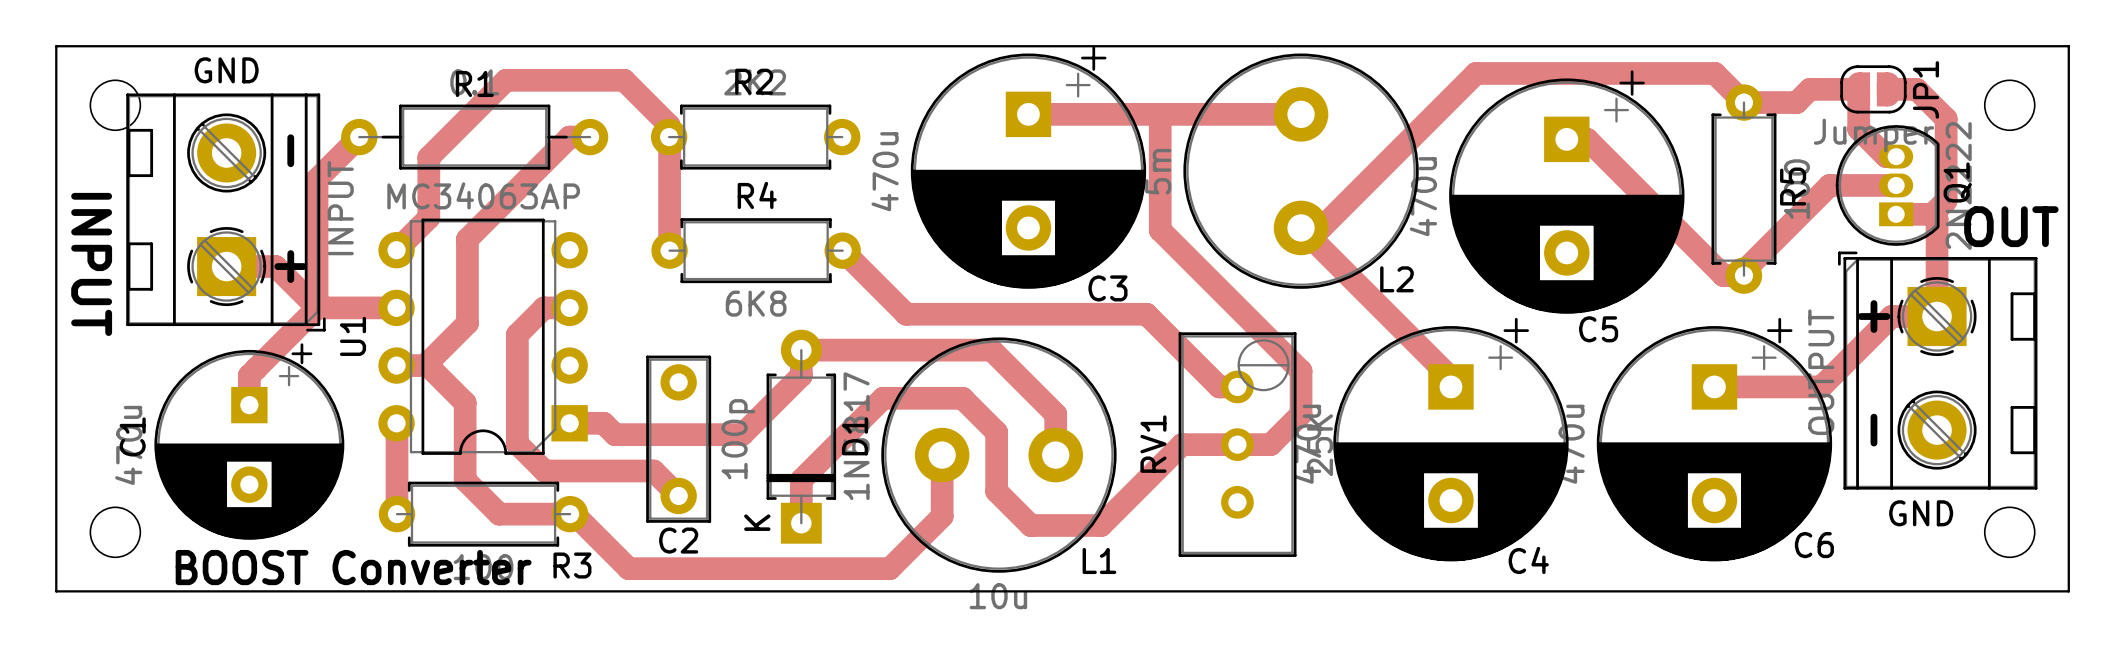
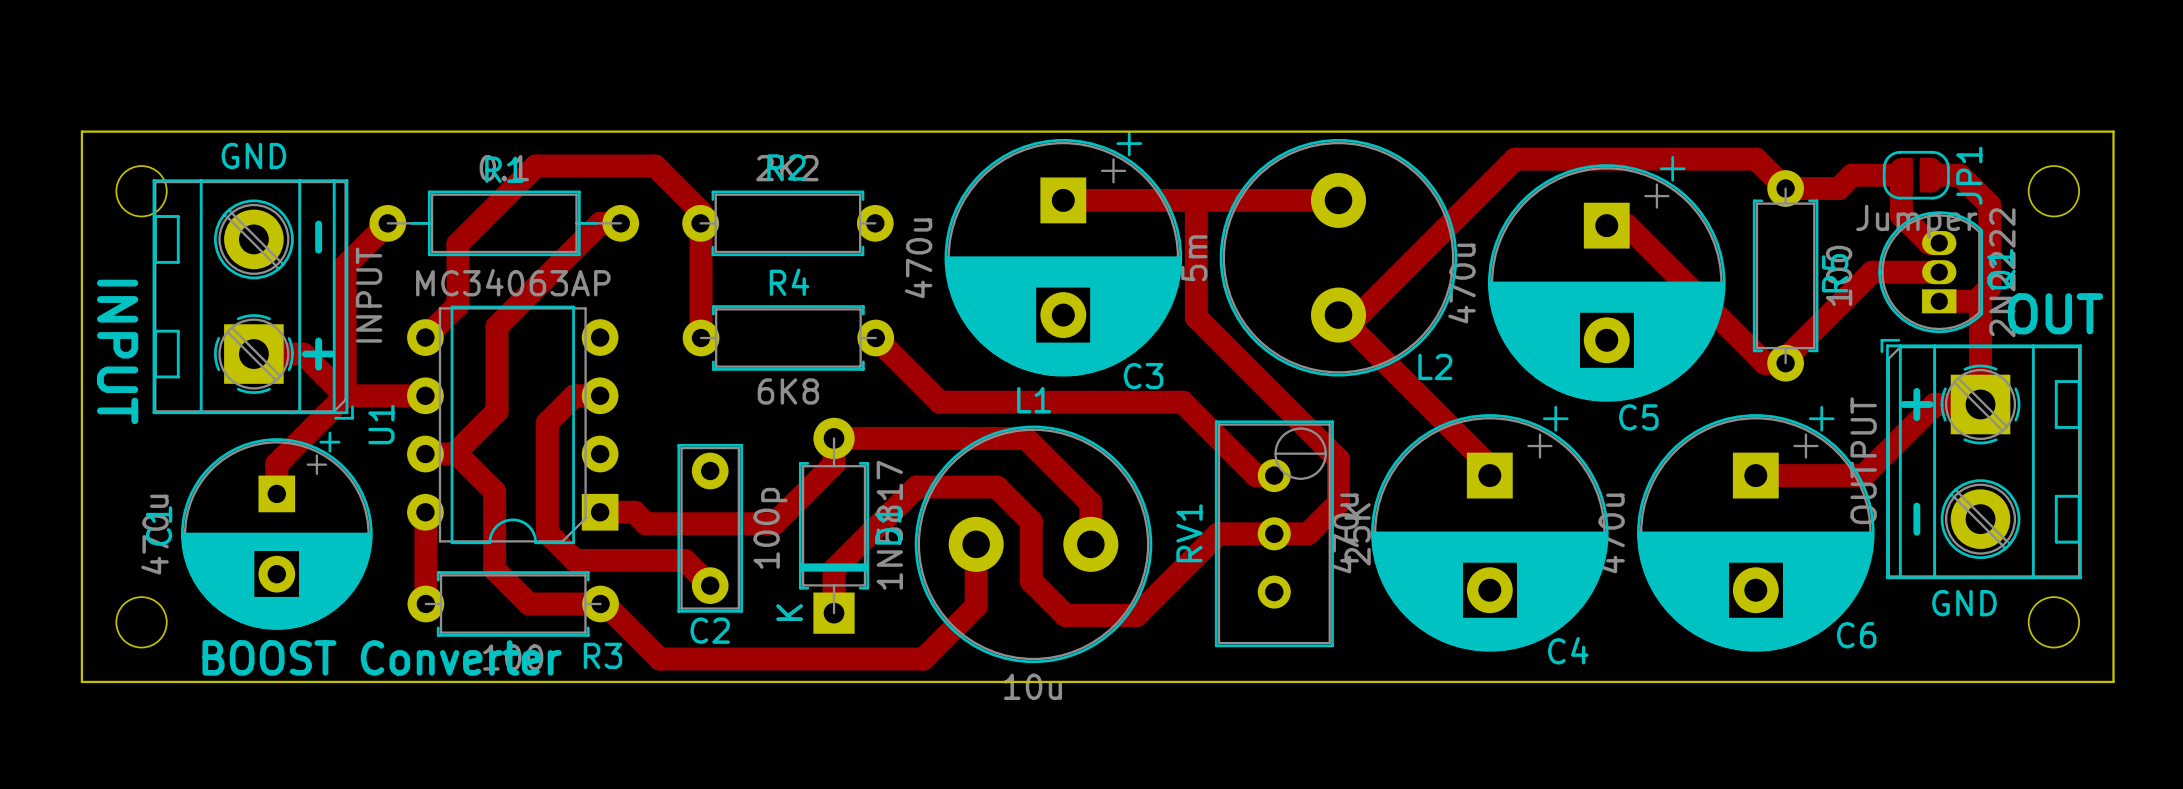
L1 name position: L1 (1099, 560) -> L1 (1034, 400)

